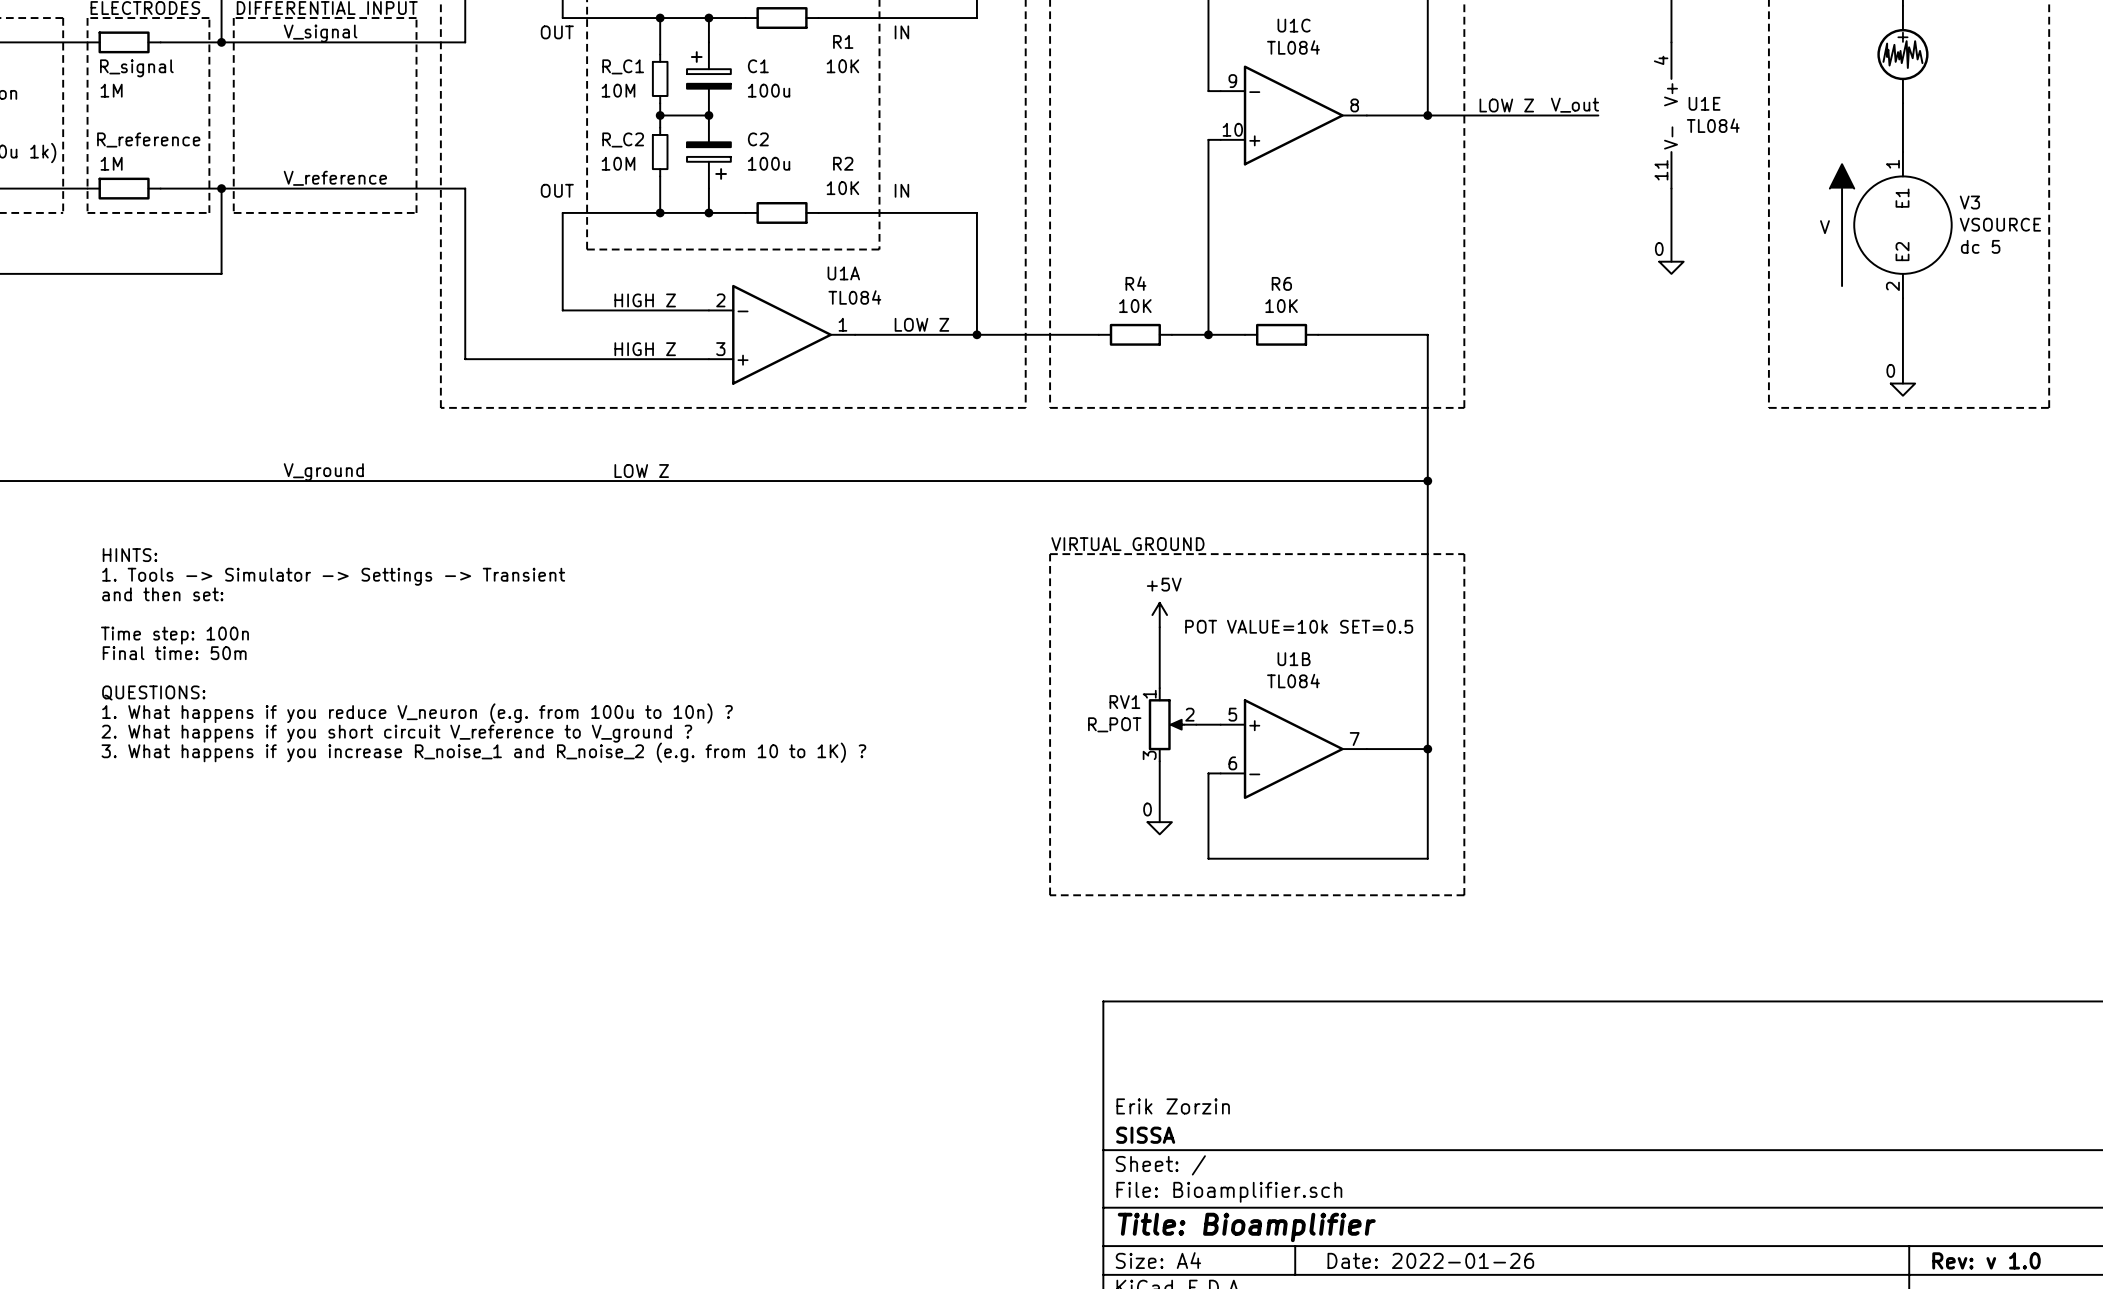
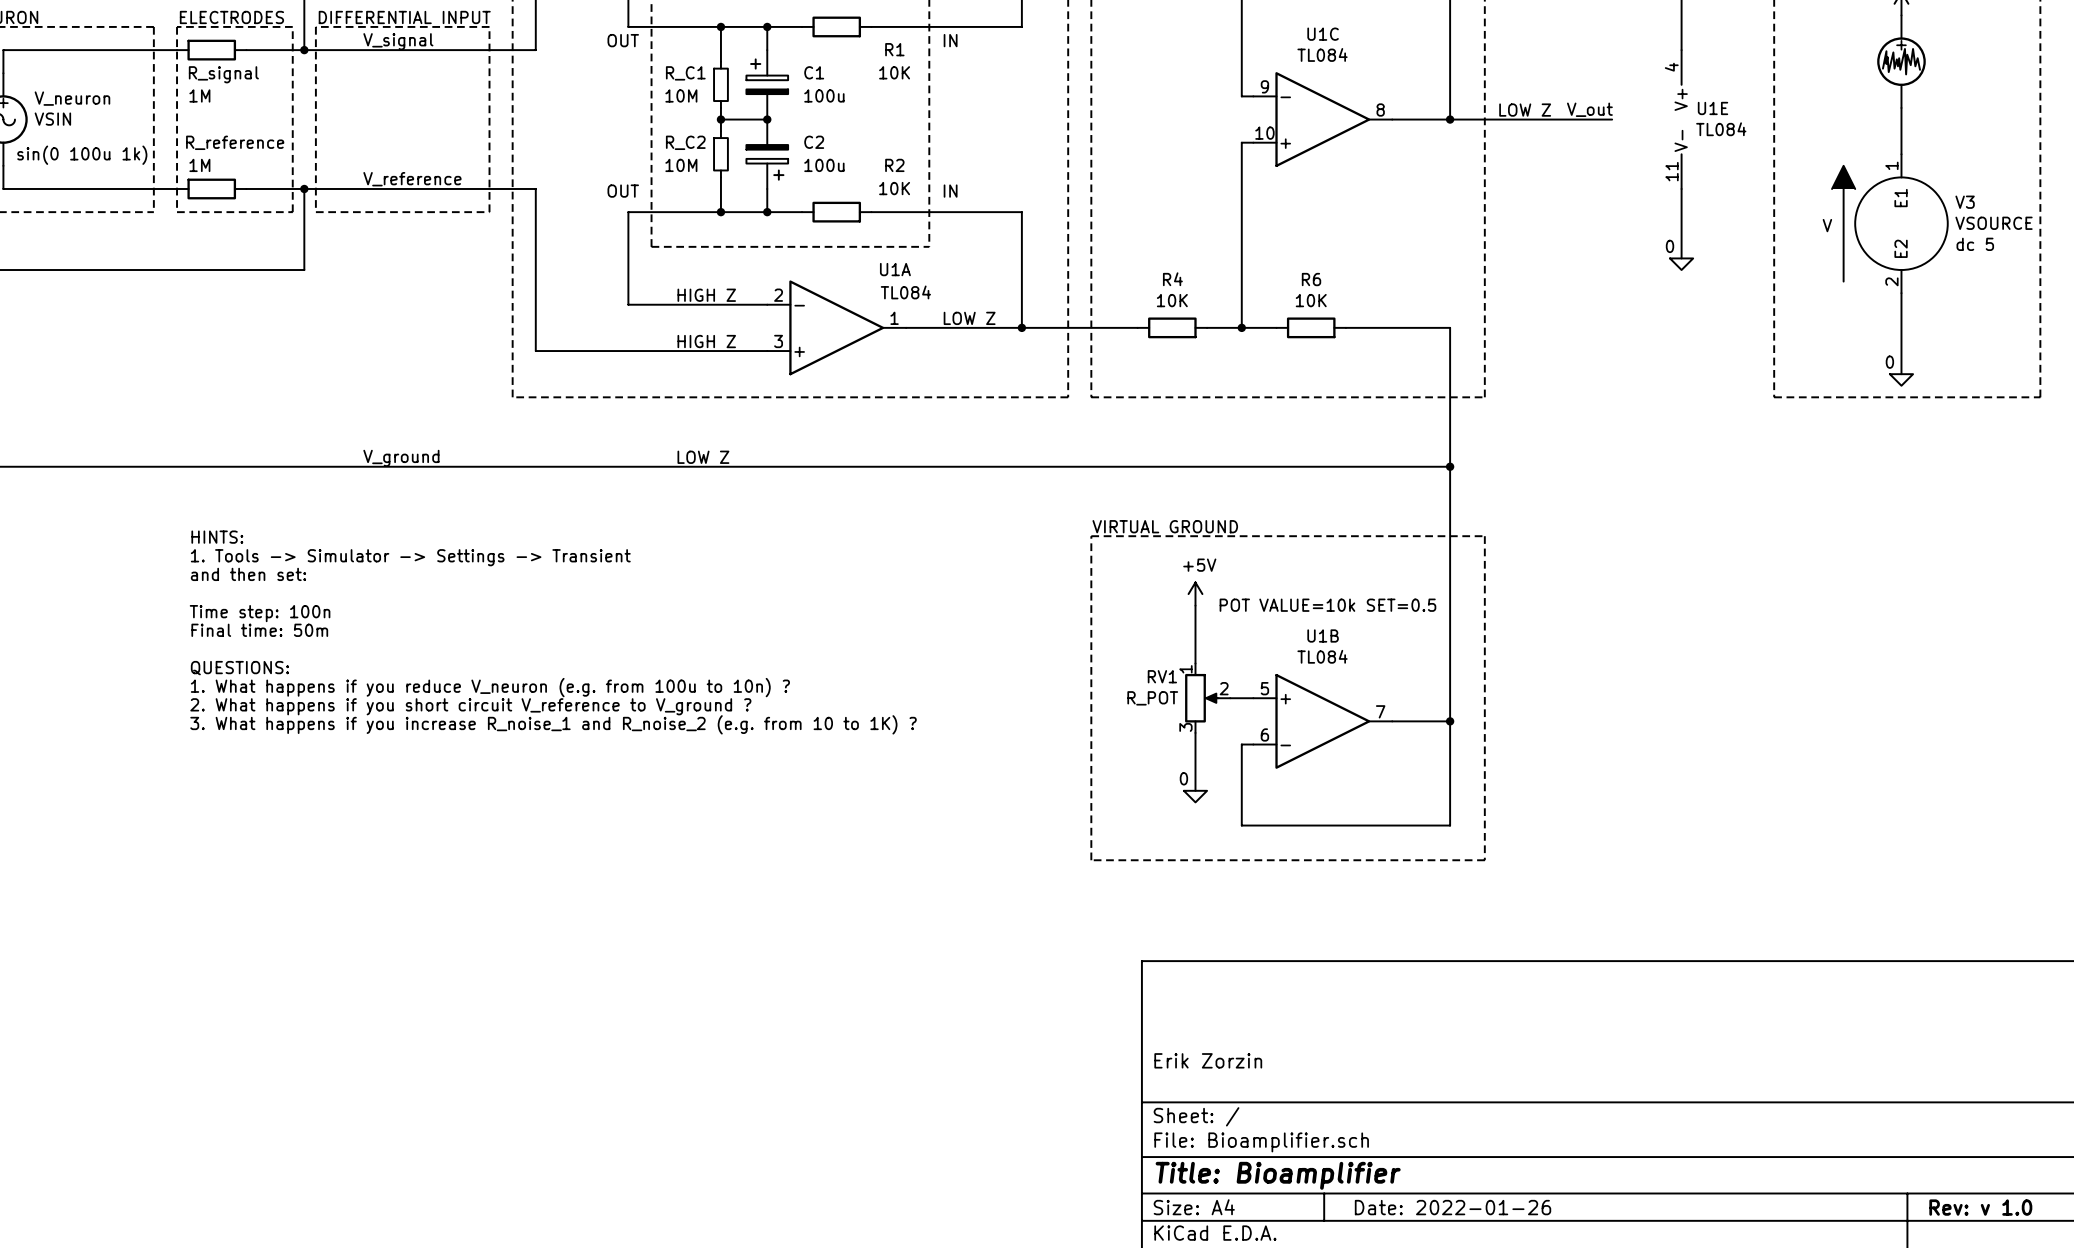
title block: SISSA (1145, 1135) -> none

